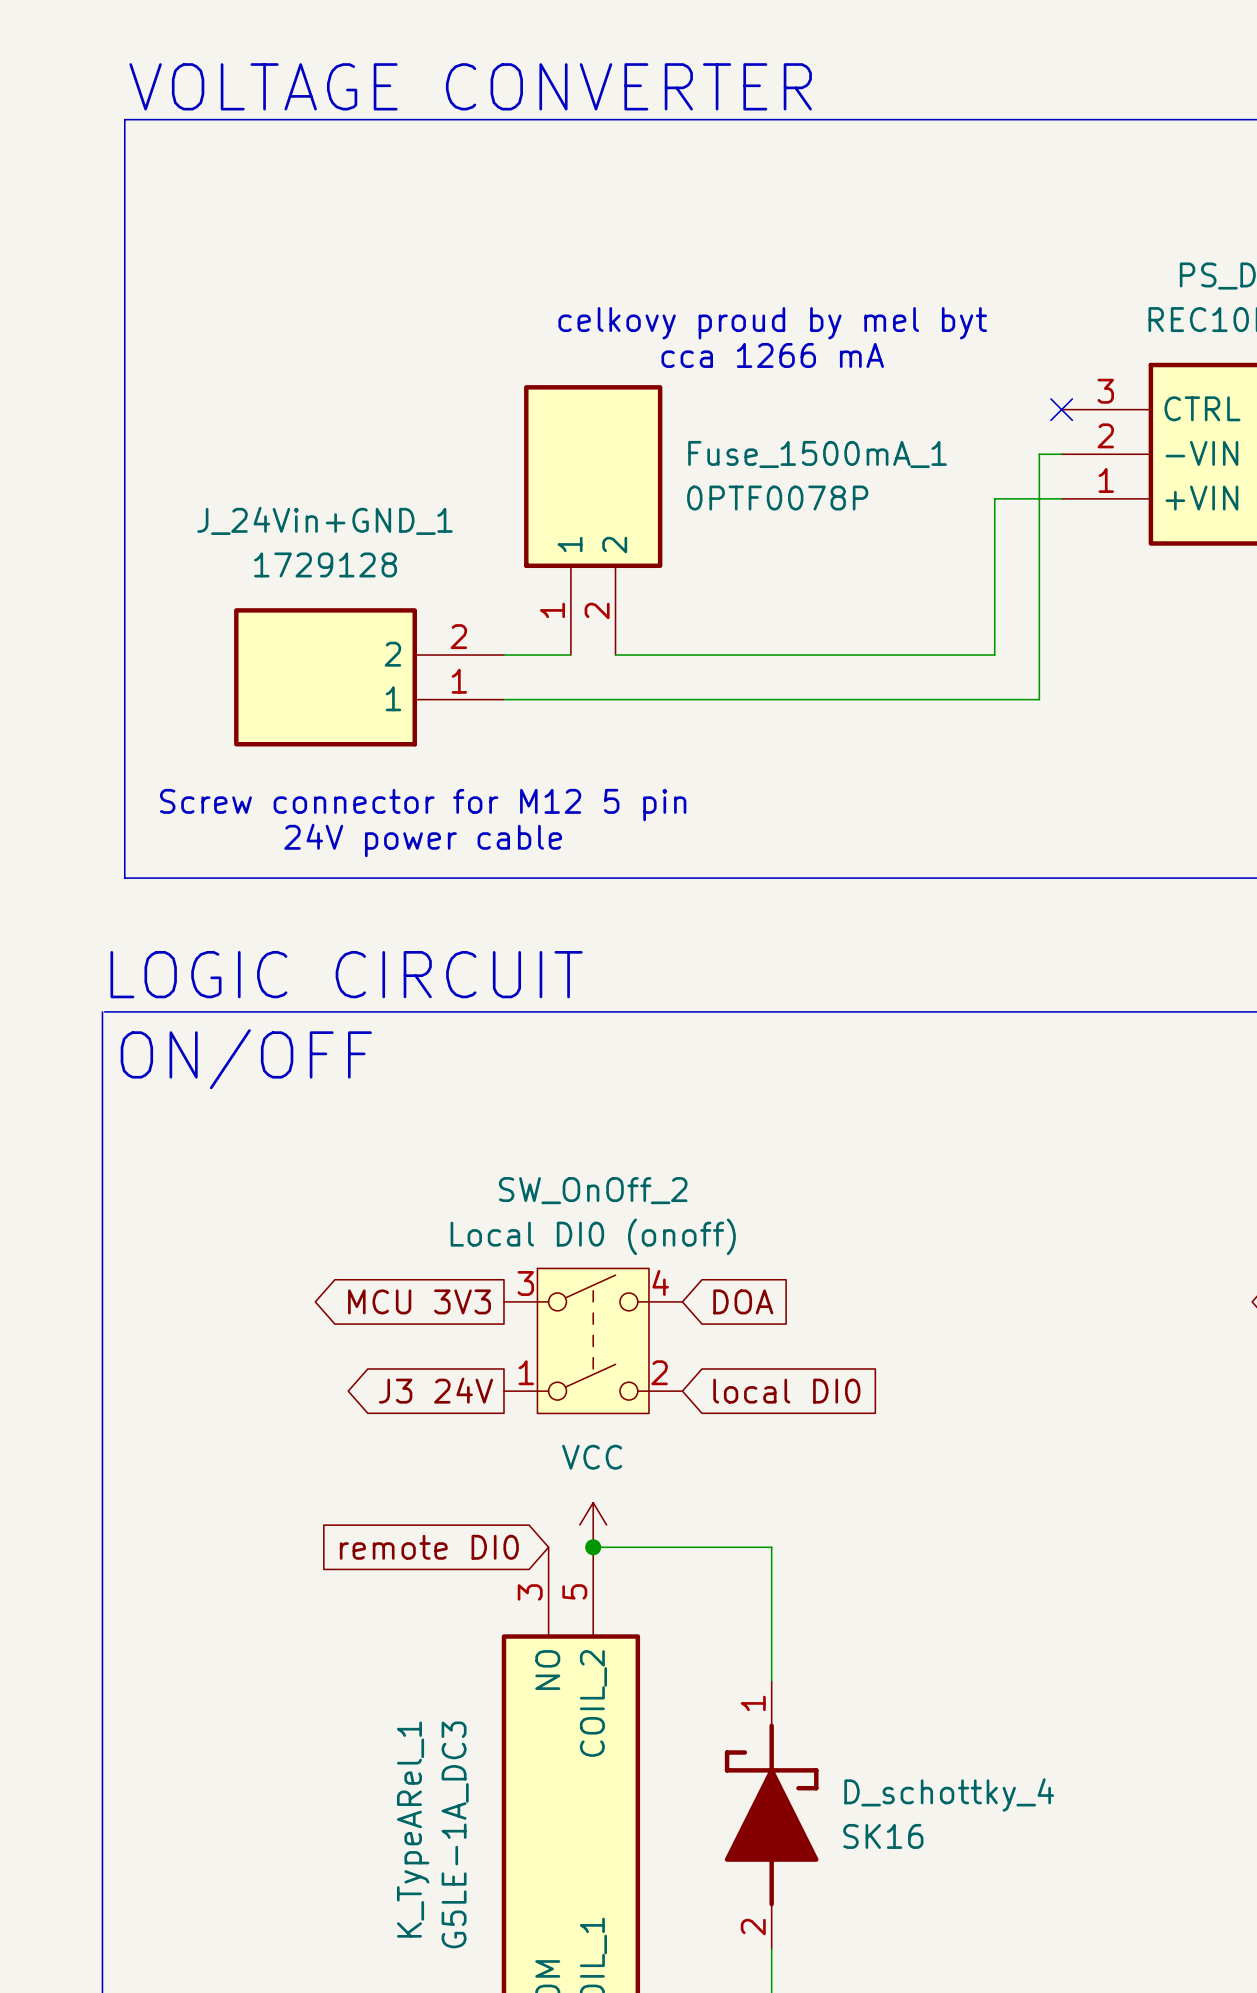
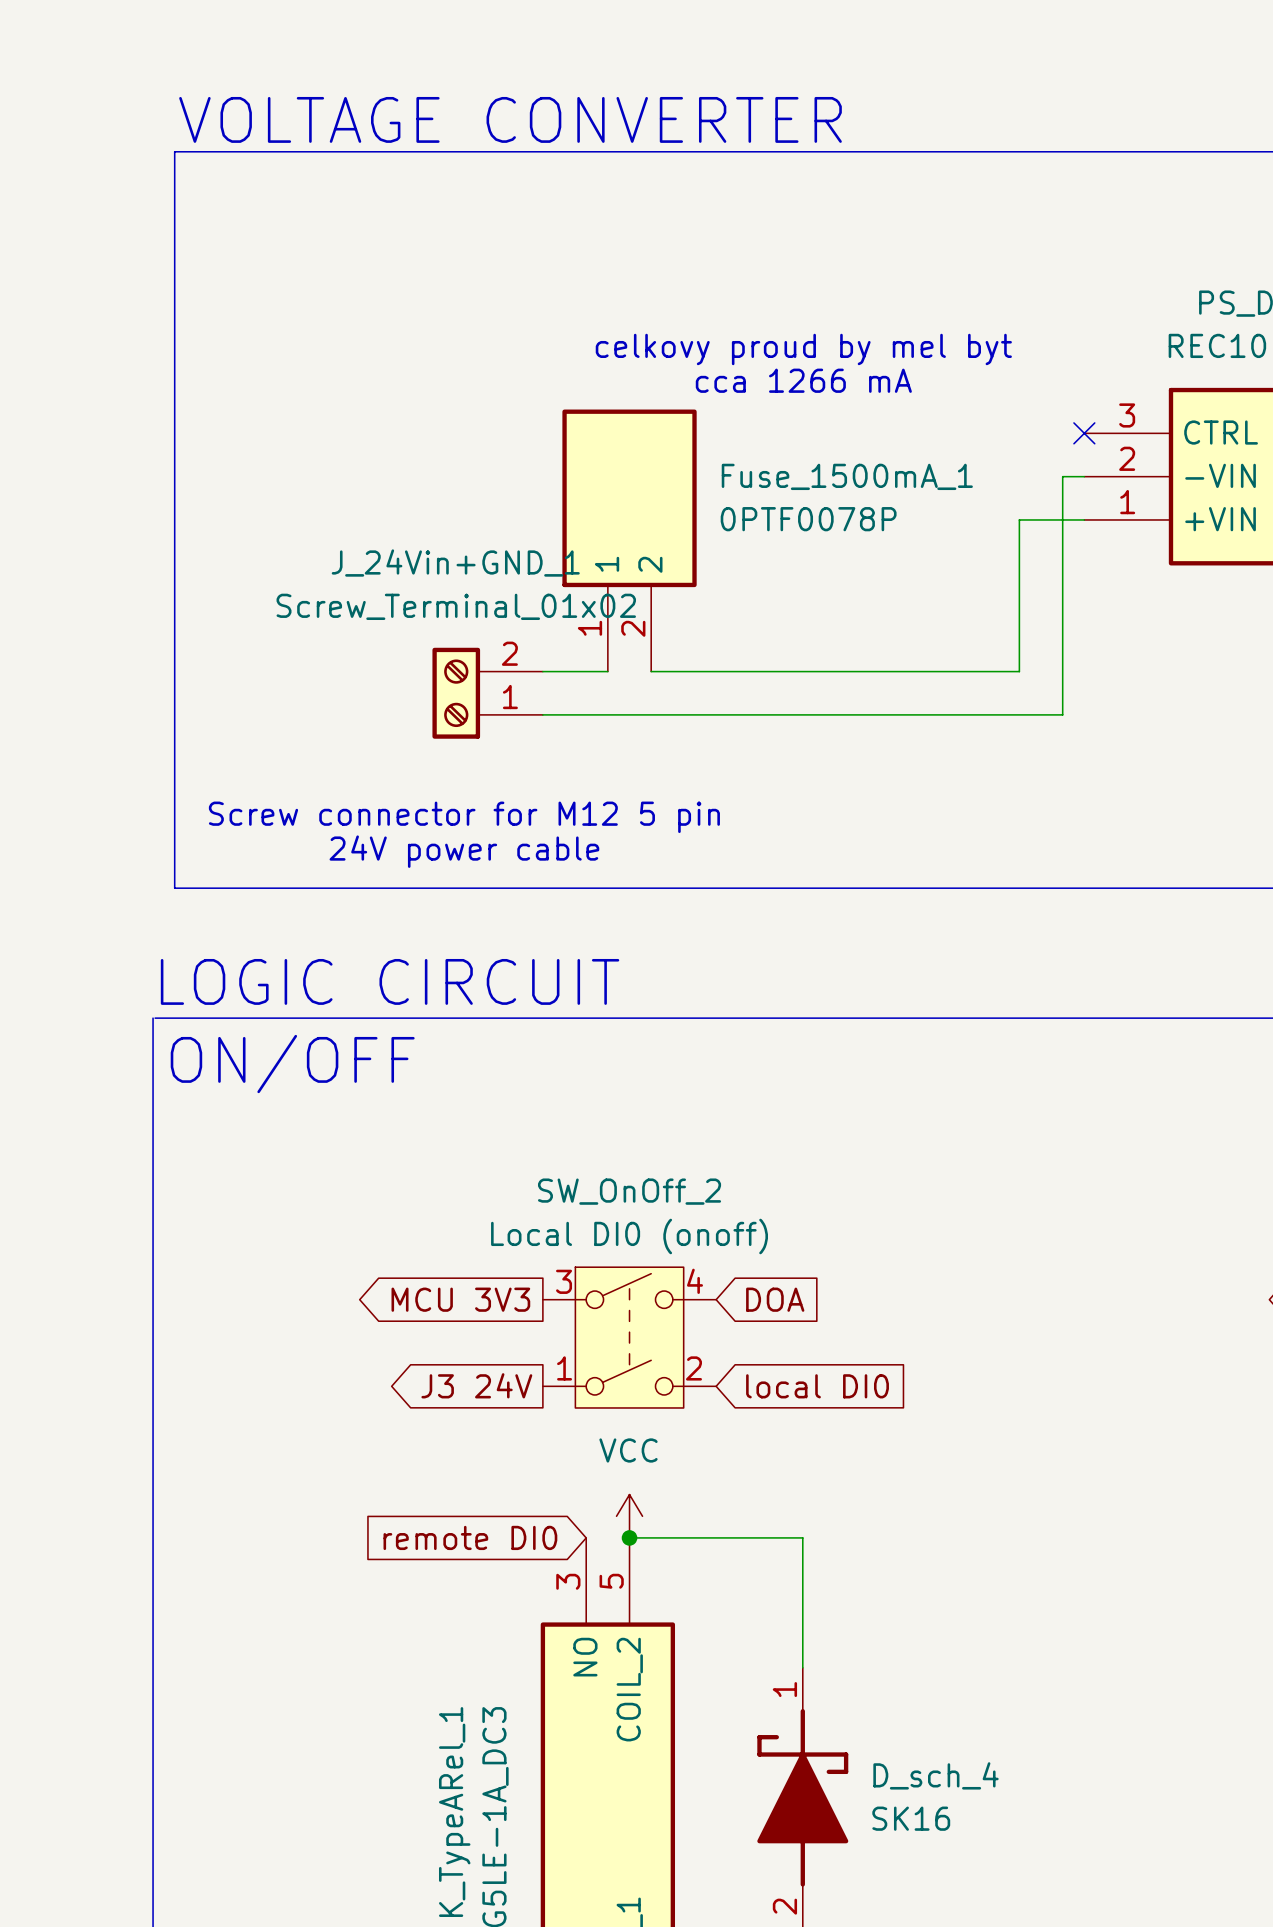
J_24Vin+GND_1 value: 1729128 (325, 564) -> Screw_Terminal_01x02 (456, 606)
J_24Vin+GND_1 symbol: [234, 608, 504, 747] -> [432, 647, 543, 739]
D_schottky_4 name: D_schottky_4 (949, 1795) -> D_sch_4 (936, 1775)

